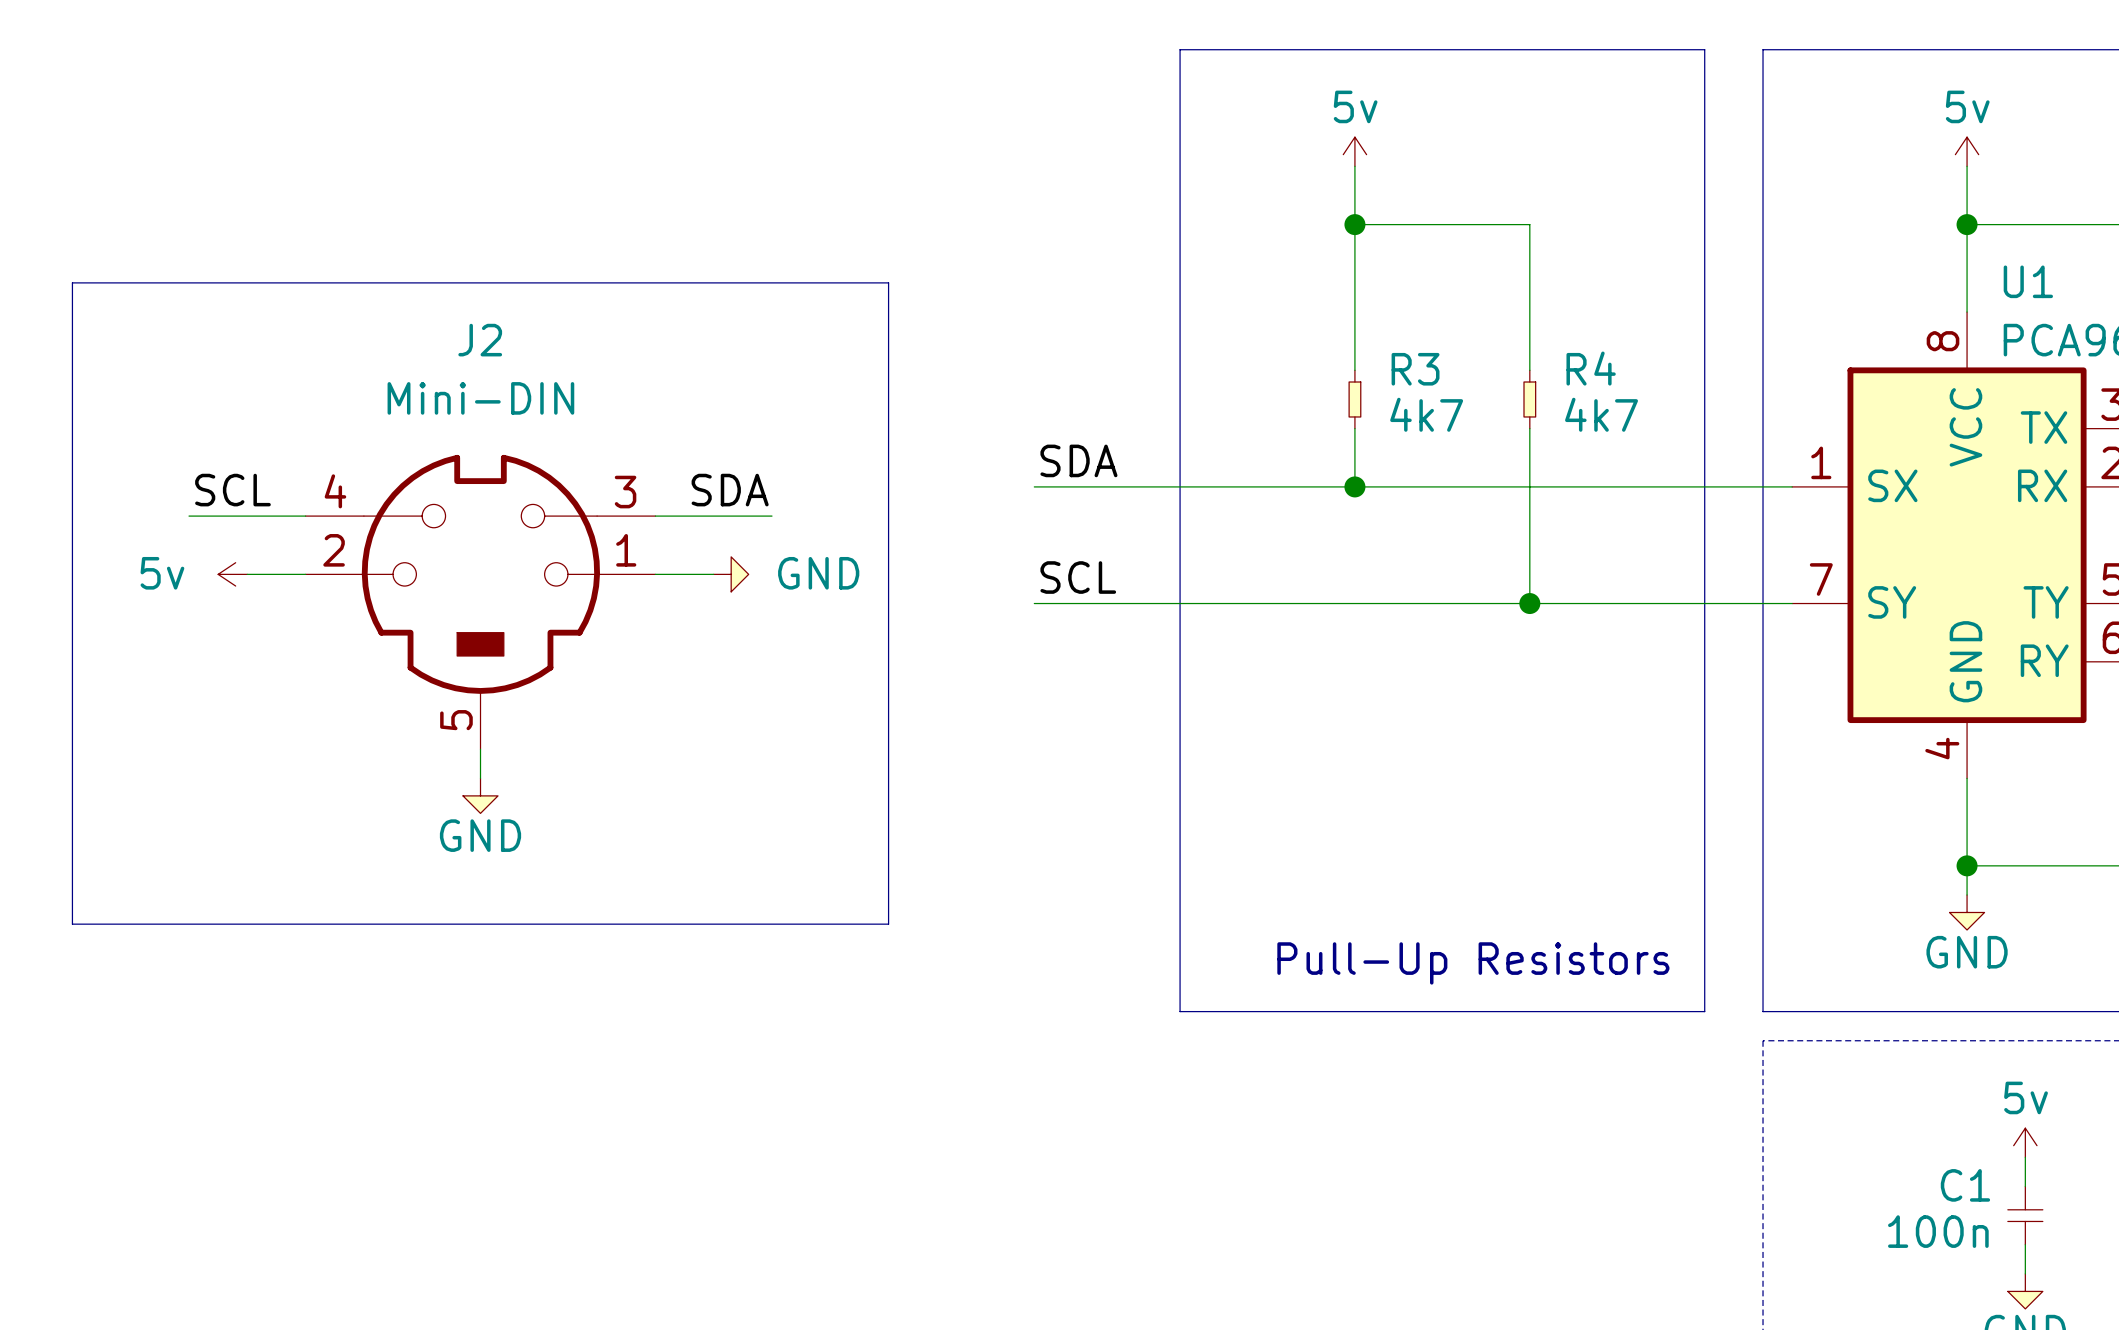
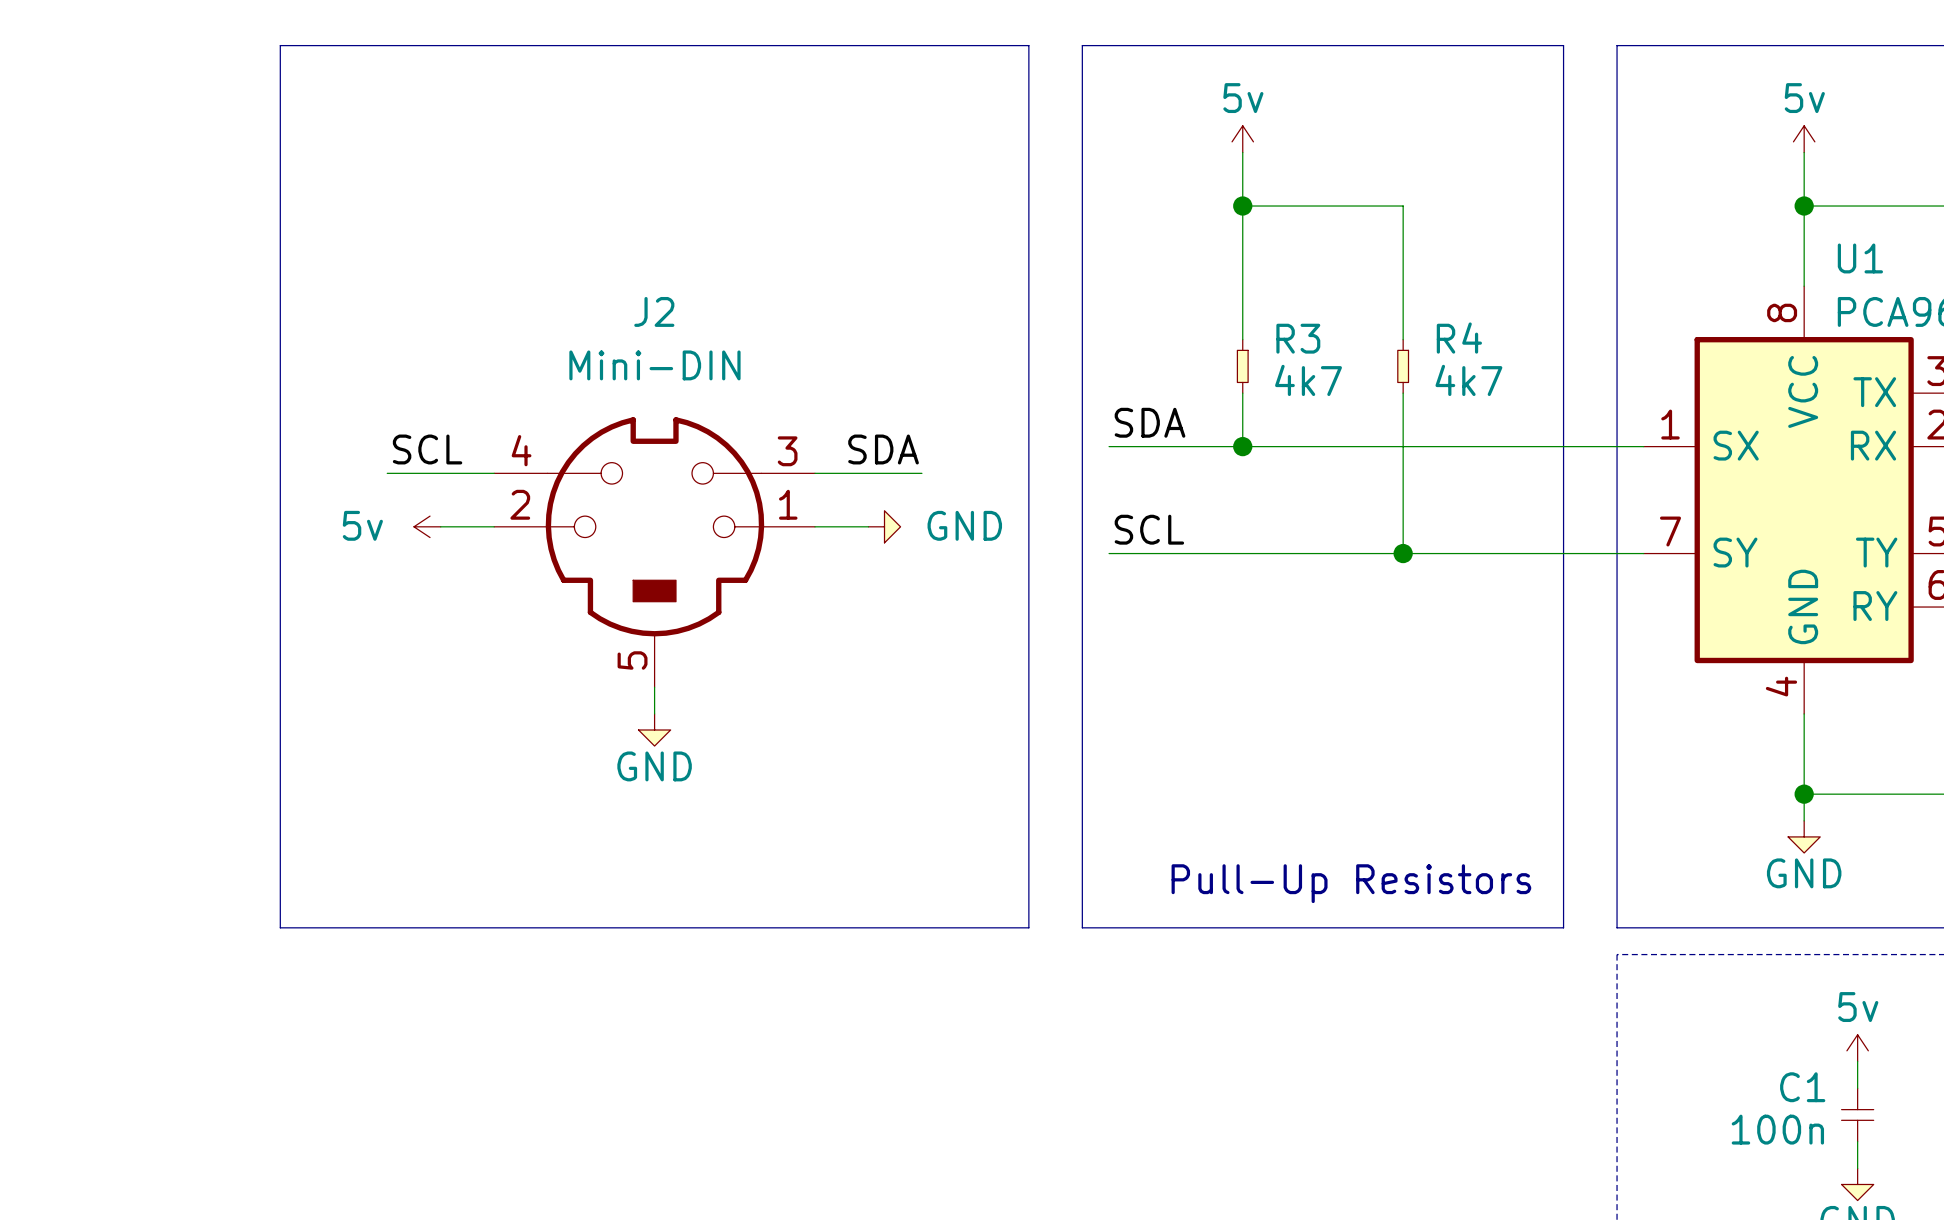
line: none -> (280, 45) (280, 927) (1028, 927) (1028, 45) (280, 45)
line: (72, 282) (72, 924) (888, 924) (888, 282) (72, 282) -> none
label position: SDA (1078, 460) -> SDA (883, 449)
label: none -> SDA (1150, 422)
wire: (1034, 486) (1209, 486) -> none
label position: SCL (232, 490) -> SCL (427, 449)
label: SDA (730, 490) -> none
wire: (189, 516) (305, 516) -> (387, 473) (494, 473)
wire: (655, 516) (771, 516) -> (815, 473) (921, 473)
power symbol position: 5v (232, 574) -> 5v (427, 526)
wire: (247, 574) (305, 574) -> (440, 526) (494, 526)
wire: (655, 574) (713, 574) -> (815, 526) (868, 526)
power symbol: GND (731, 574) -> none
power symbol: none -> GND (884, 526)
label position: SCL (1078, 577) -> SCL (1149, 529)
J2 position: (480, 602) -> (654, 552)
wire: (1034, 603) (1209, 603) -> none
wire: (480, 749) (480, 778) -> (654, 687) (654, 713)
power symbol: GND (480, 795) -> none
power symbol: none -> GND (654, 730)

